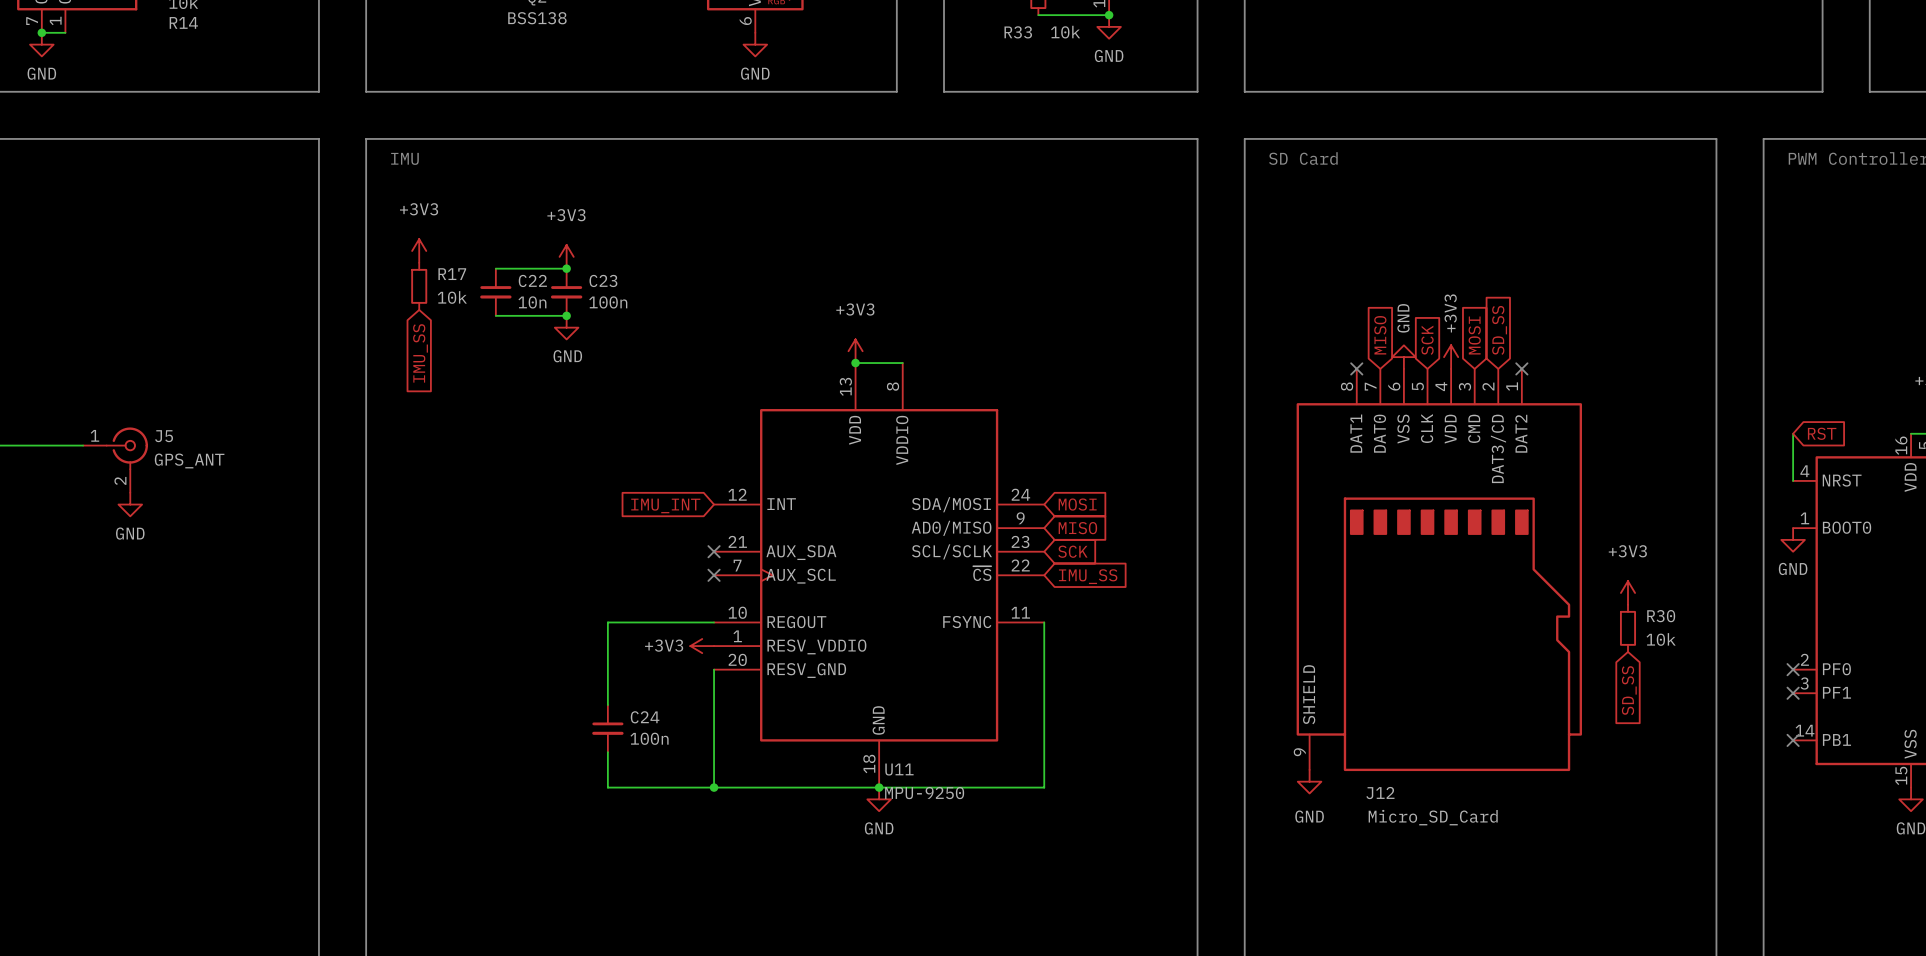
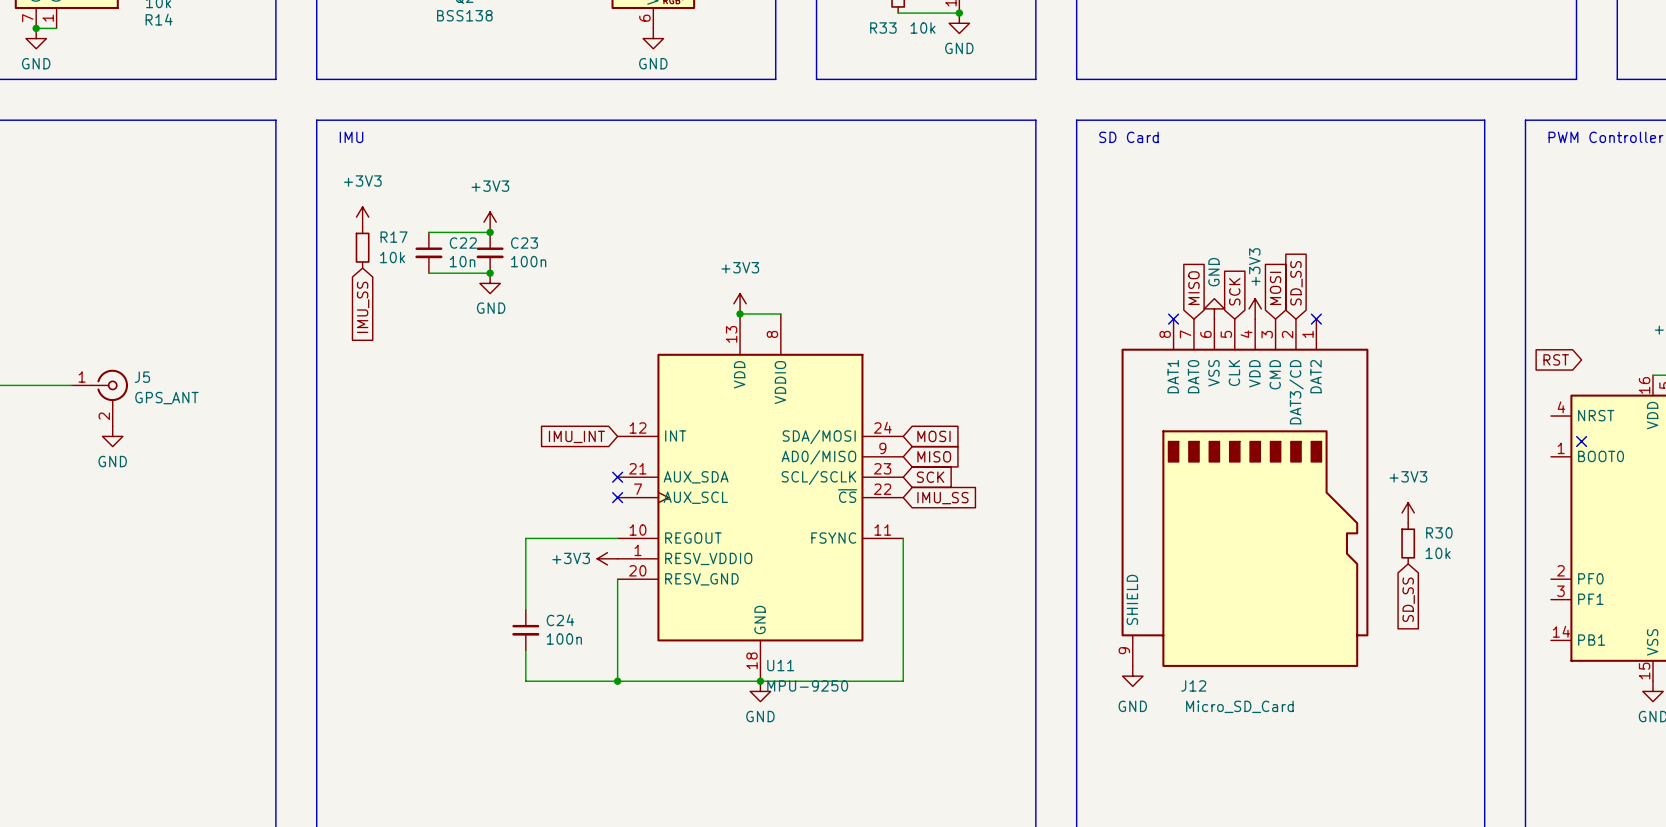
wire: (1793, 433) (1793, 480) -> none
global label rotation: 0° (1822, 433) -> 180° (1556, 359)
no-connect mark: none -> (1581, 441)
power symbol: GND (1793, 539) -> none
no-connect mark: (1793, 669) -> none
no-connect mark: (1793, 693) -> none
no-connect mark: (1793, 740) -> none

